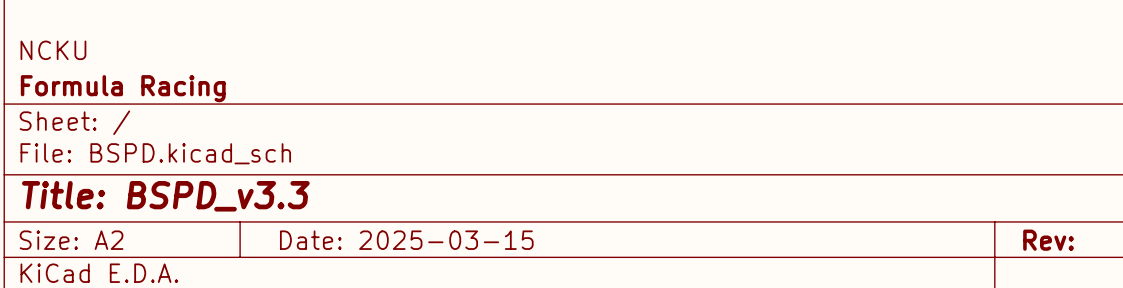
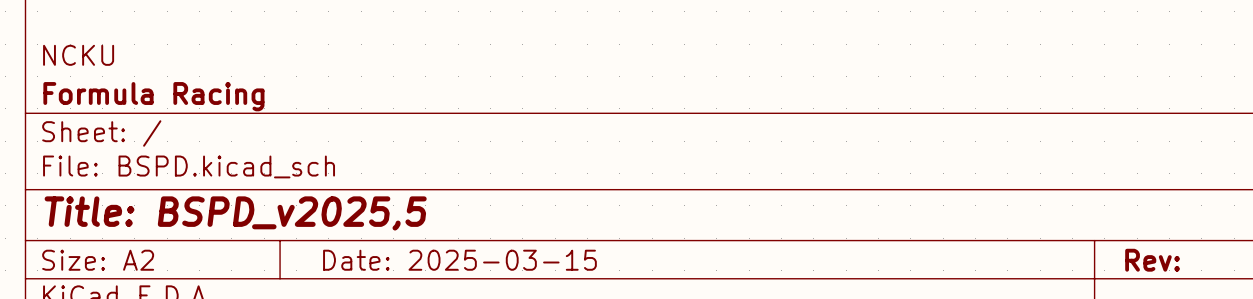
title block: Title: BSPD_v3.3 (165, 196) -> Title: BSPD_v2025,5 (235, 213)

